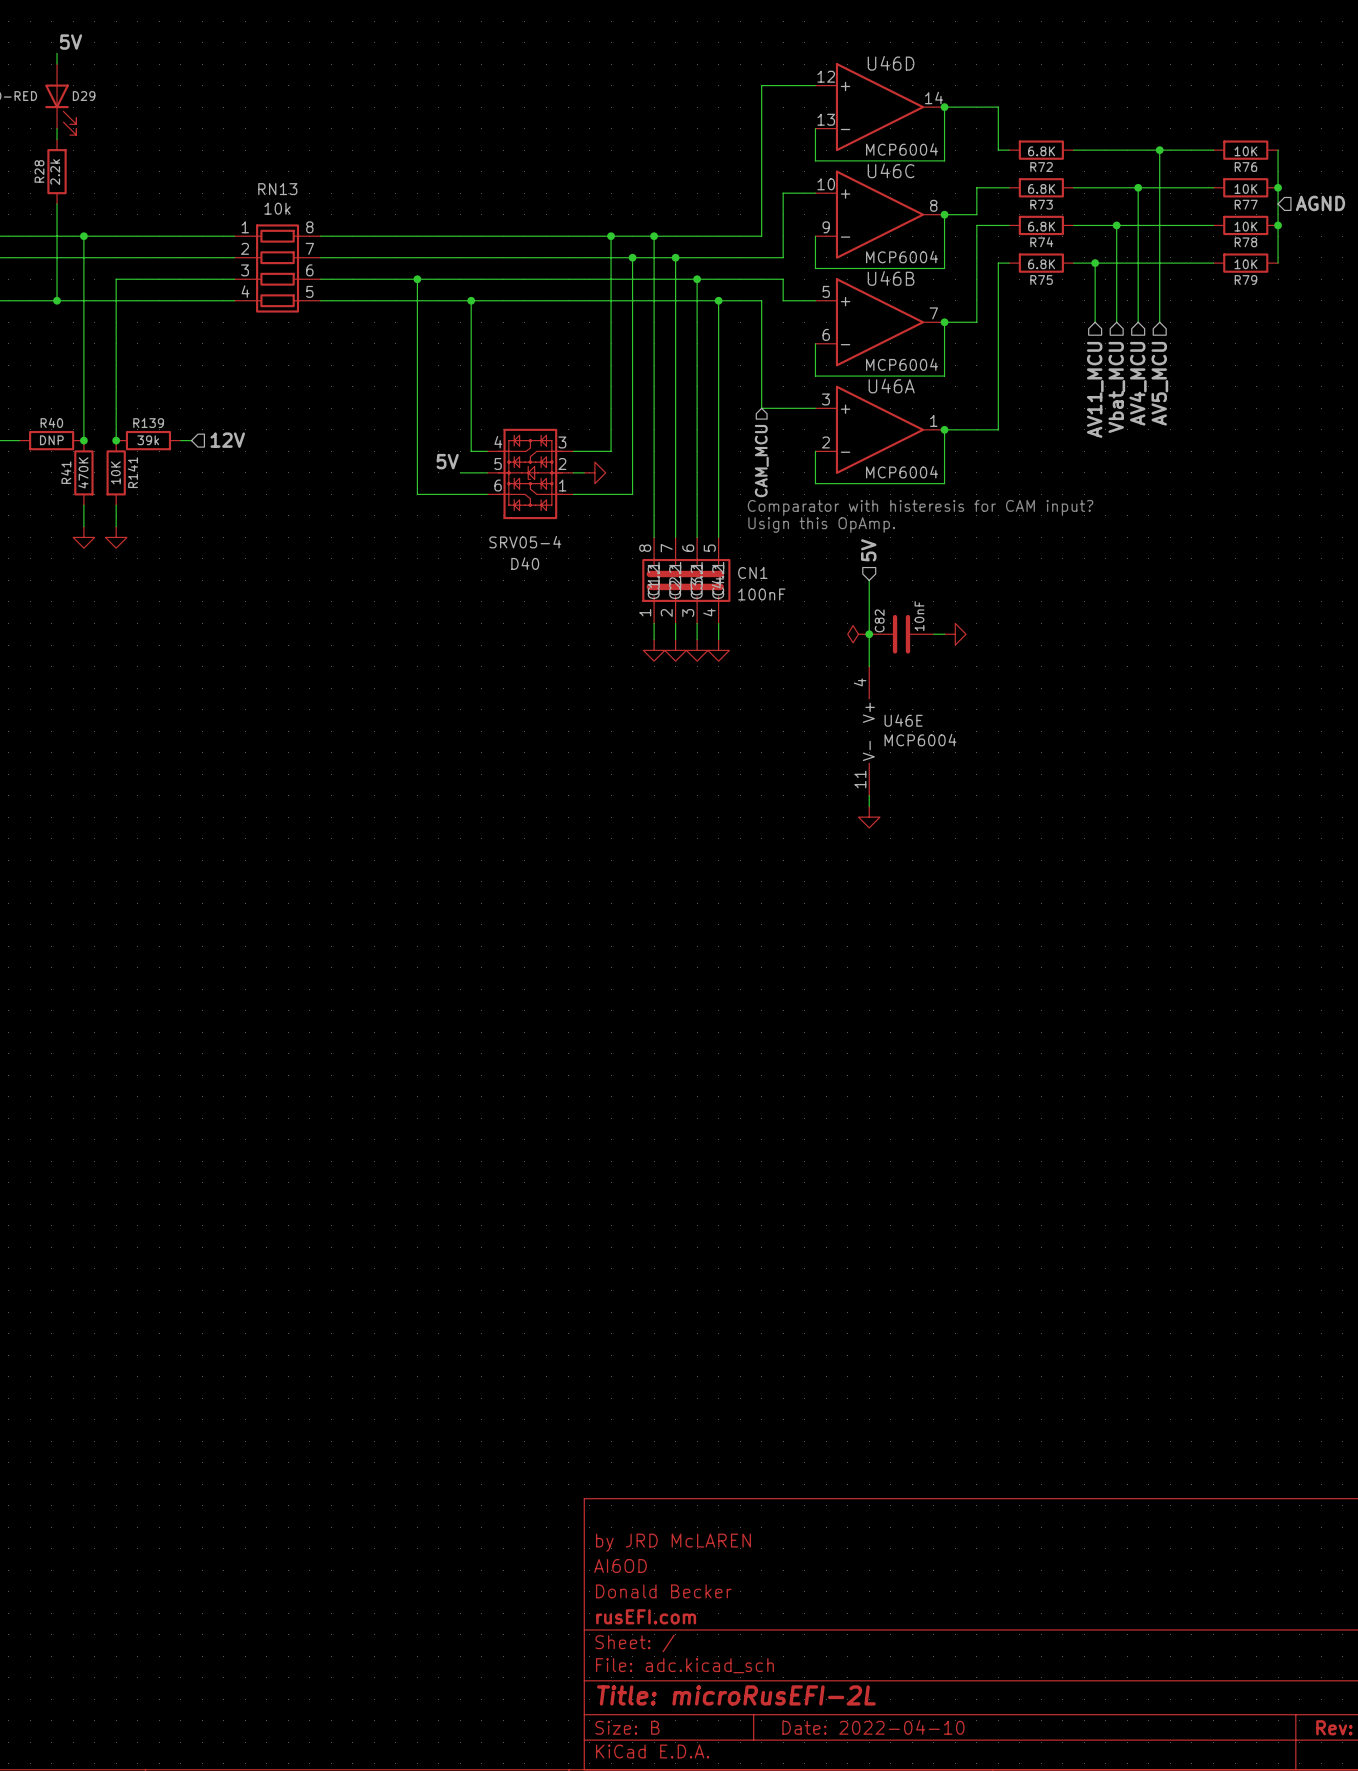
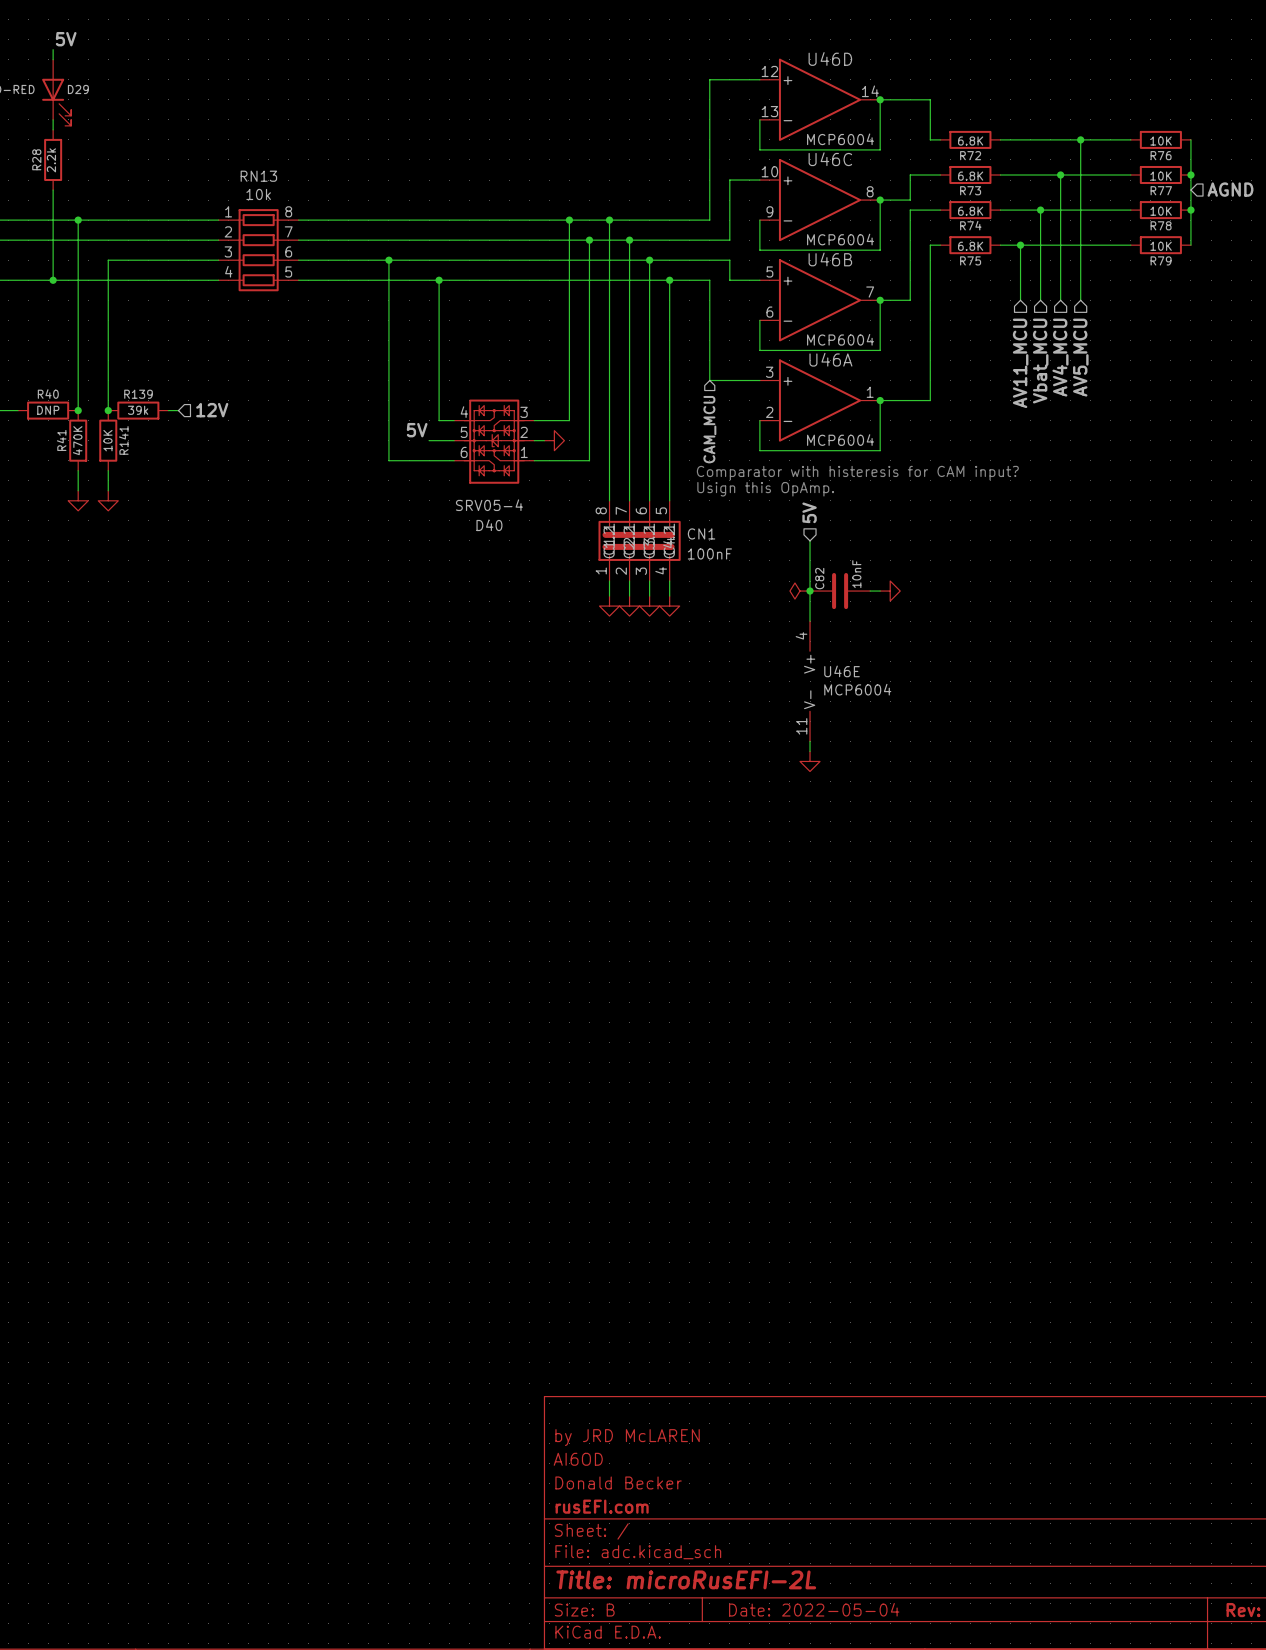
title block: Date: 2022-04-10 (873, 1727) -> Date: 2022-05-04 (814, 1609)

